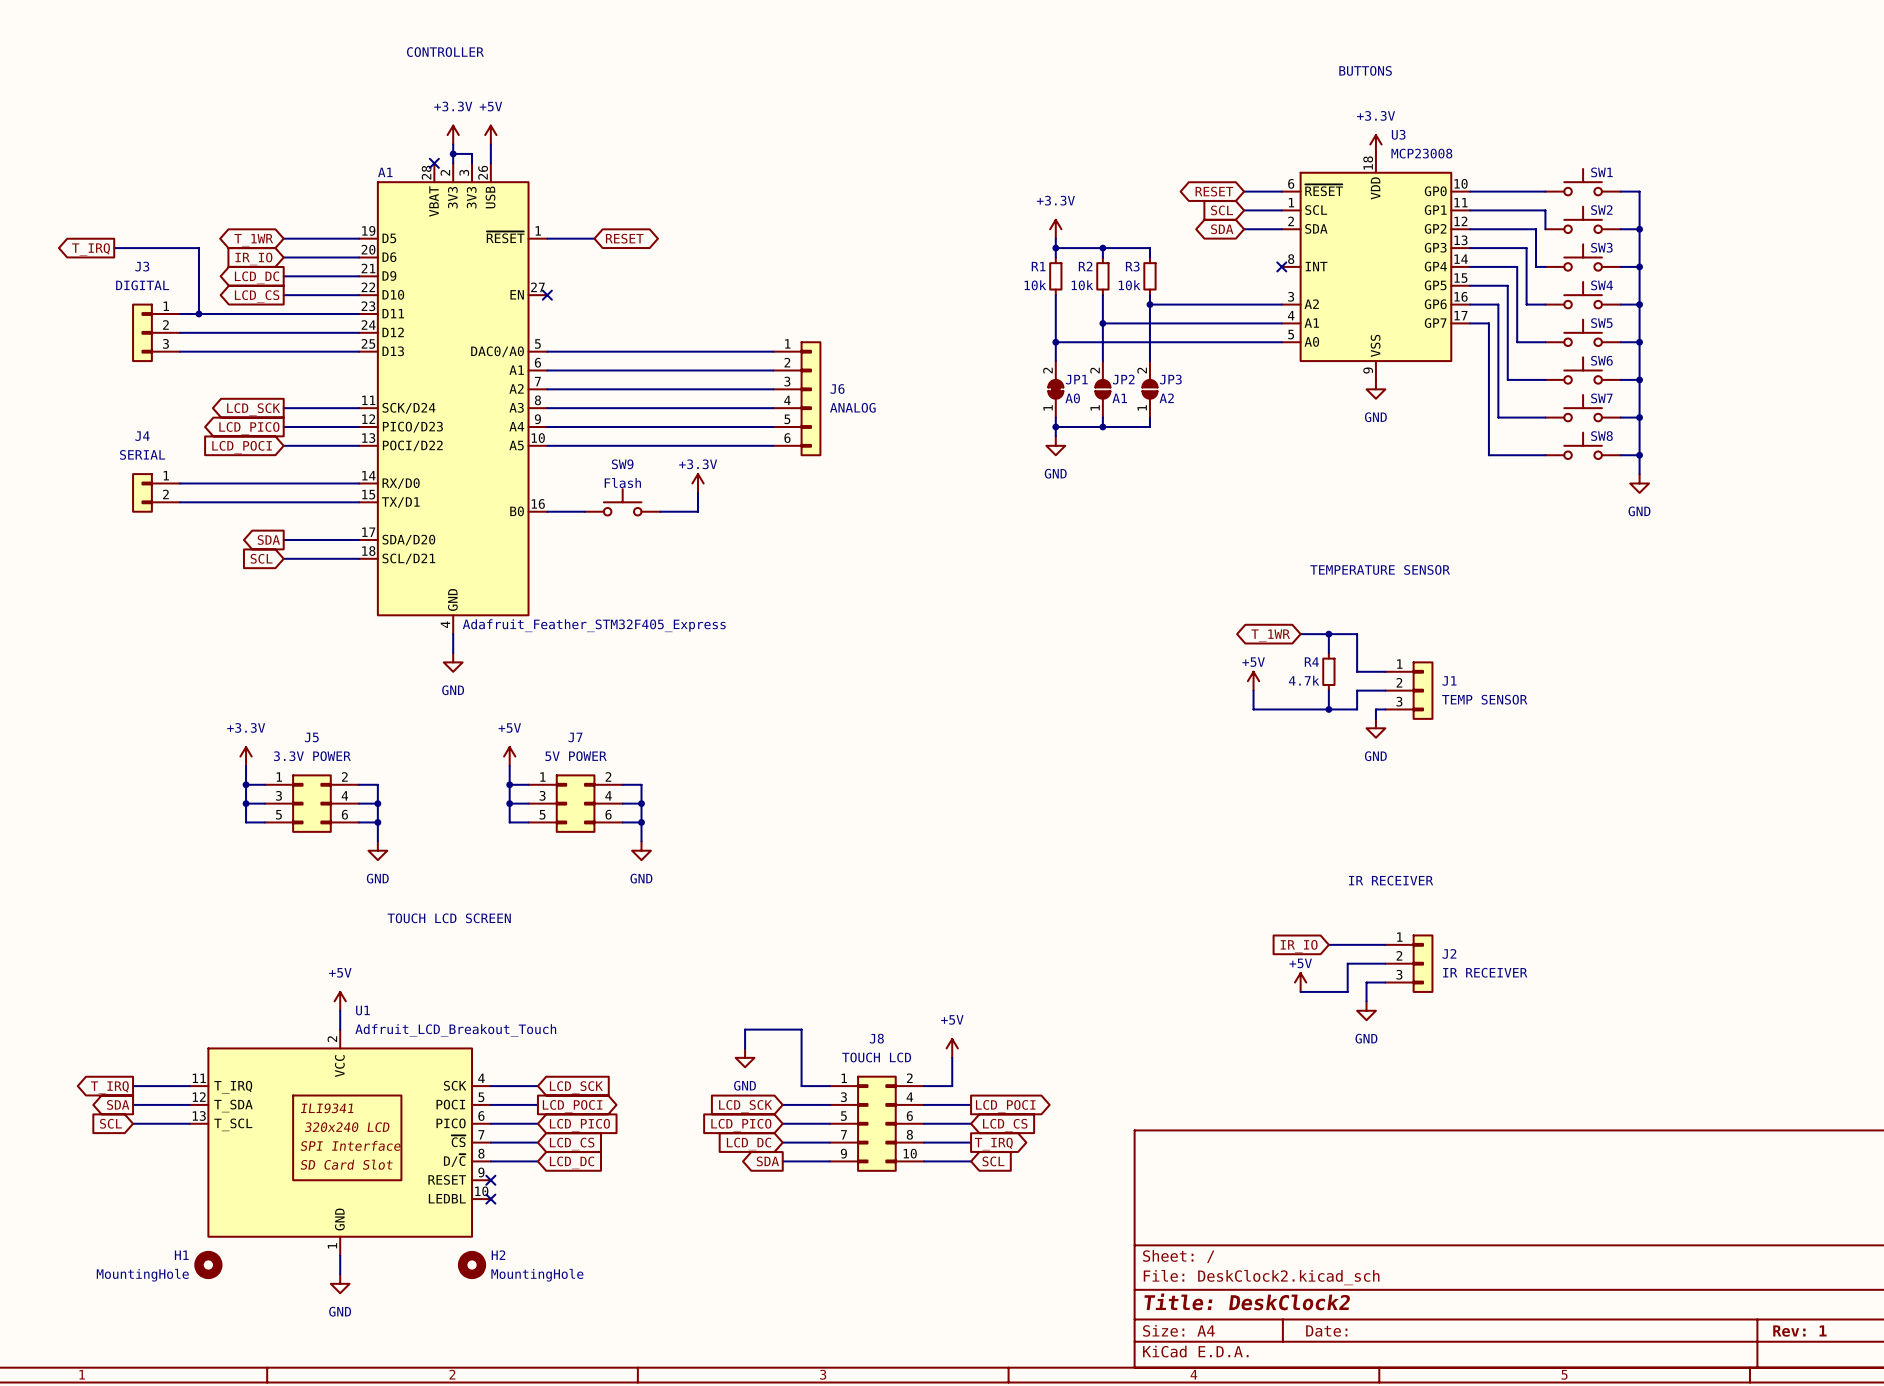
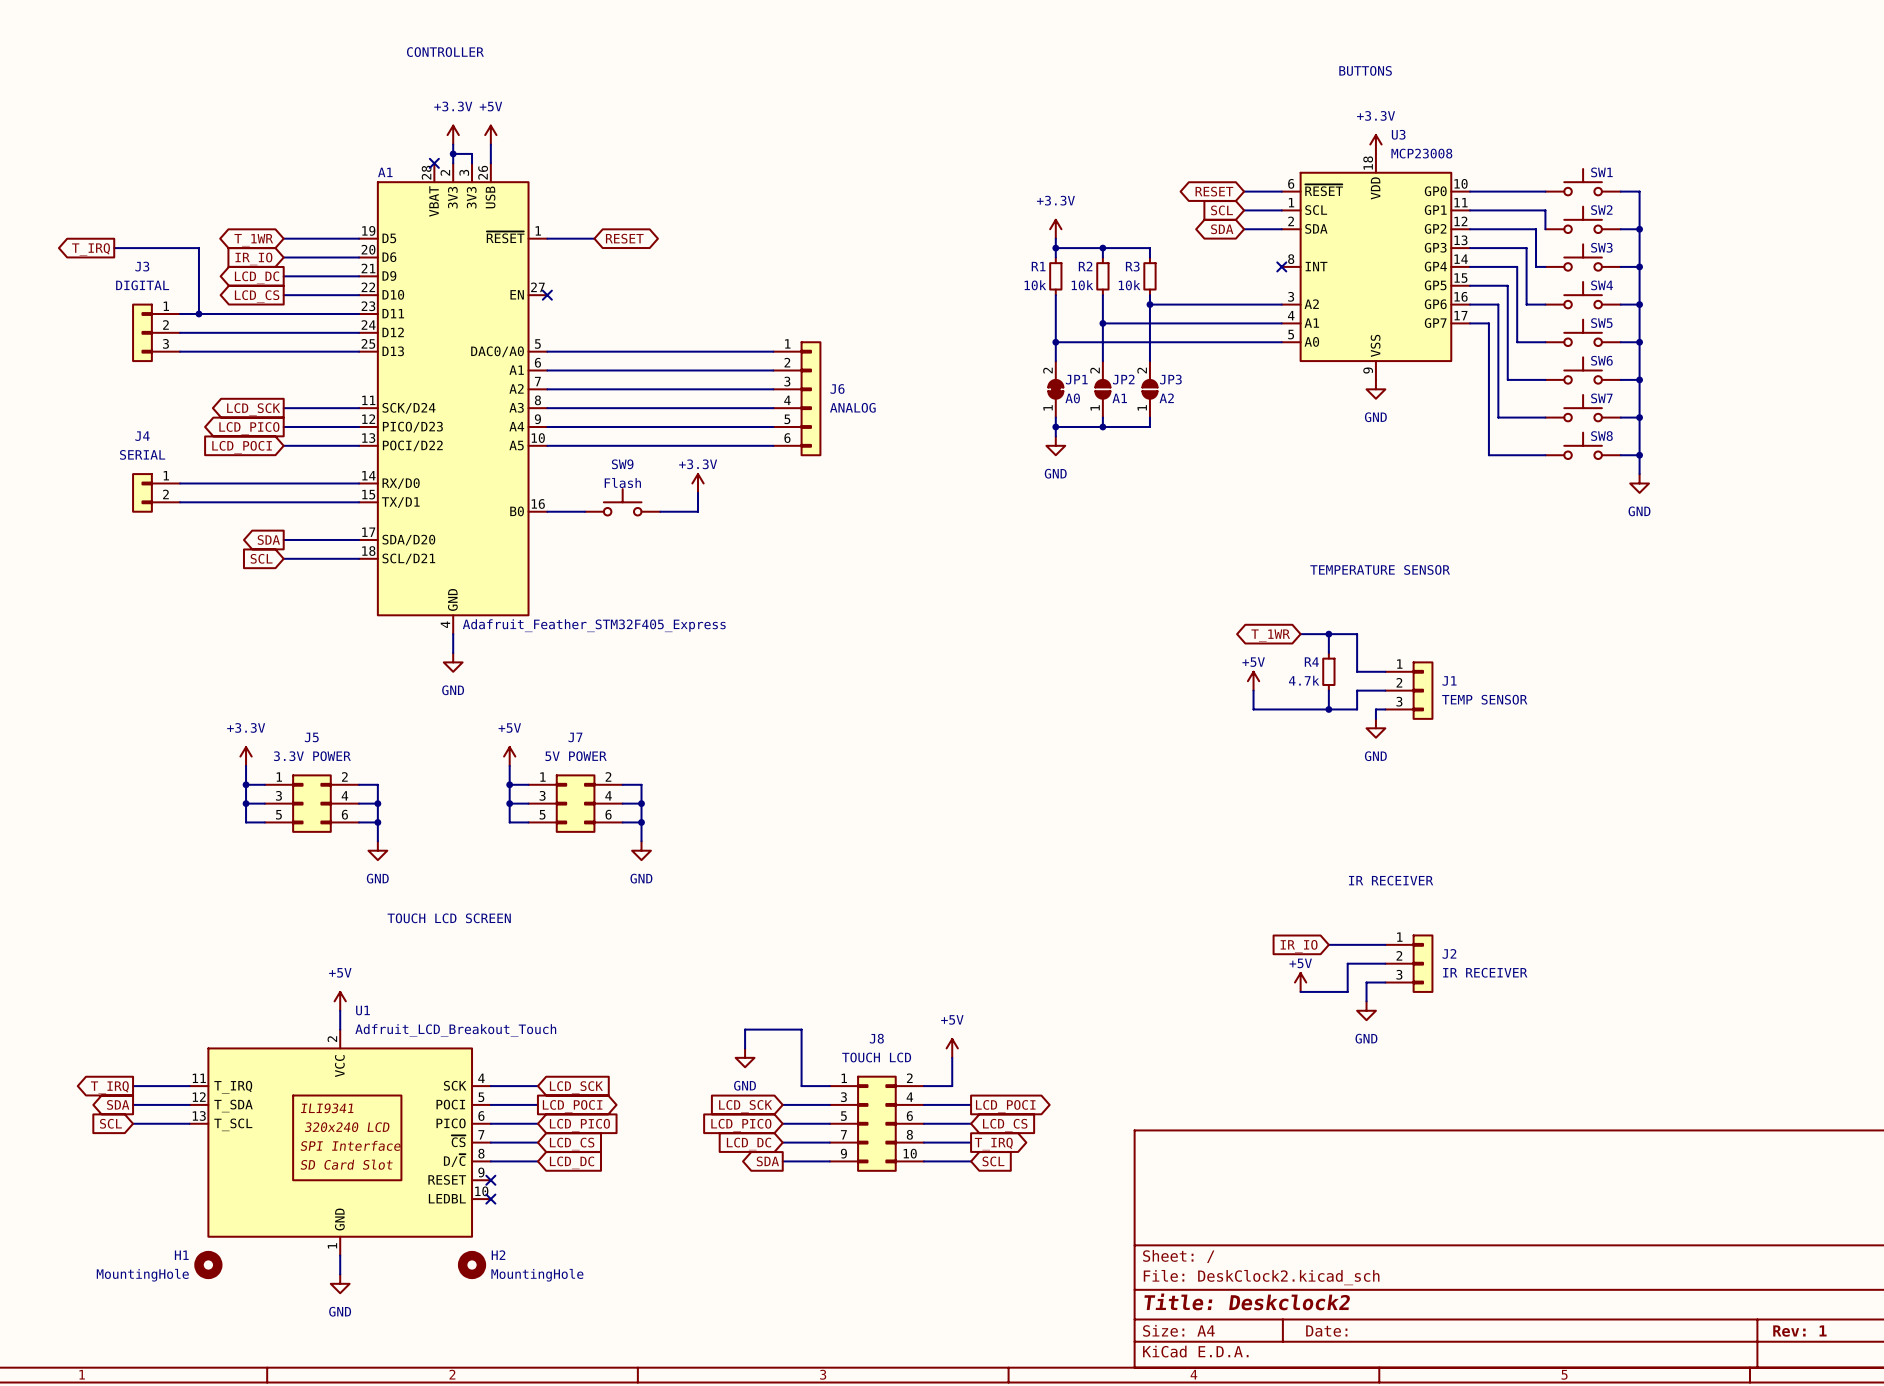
title block: Title: DeskClock2 (1247, 1301) -> Title: Deskclock2 (1247, 1301)

